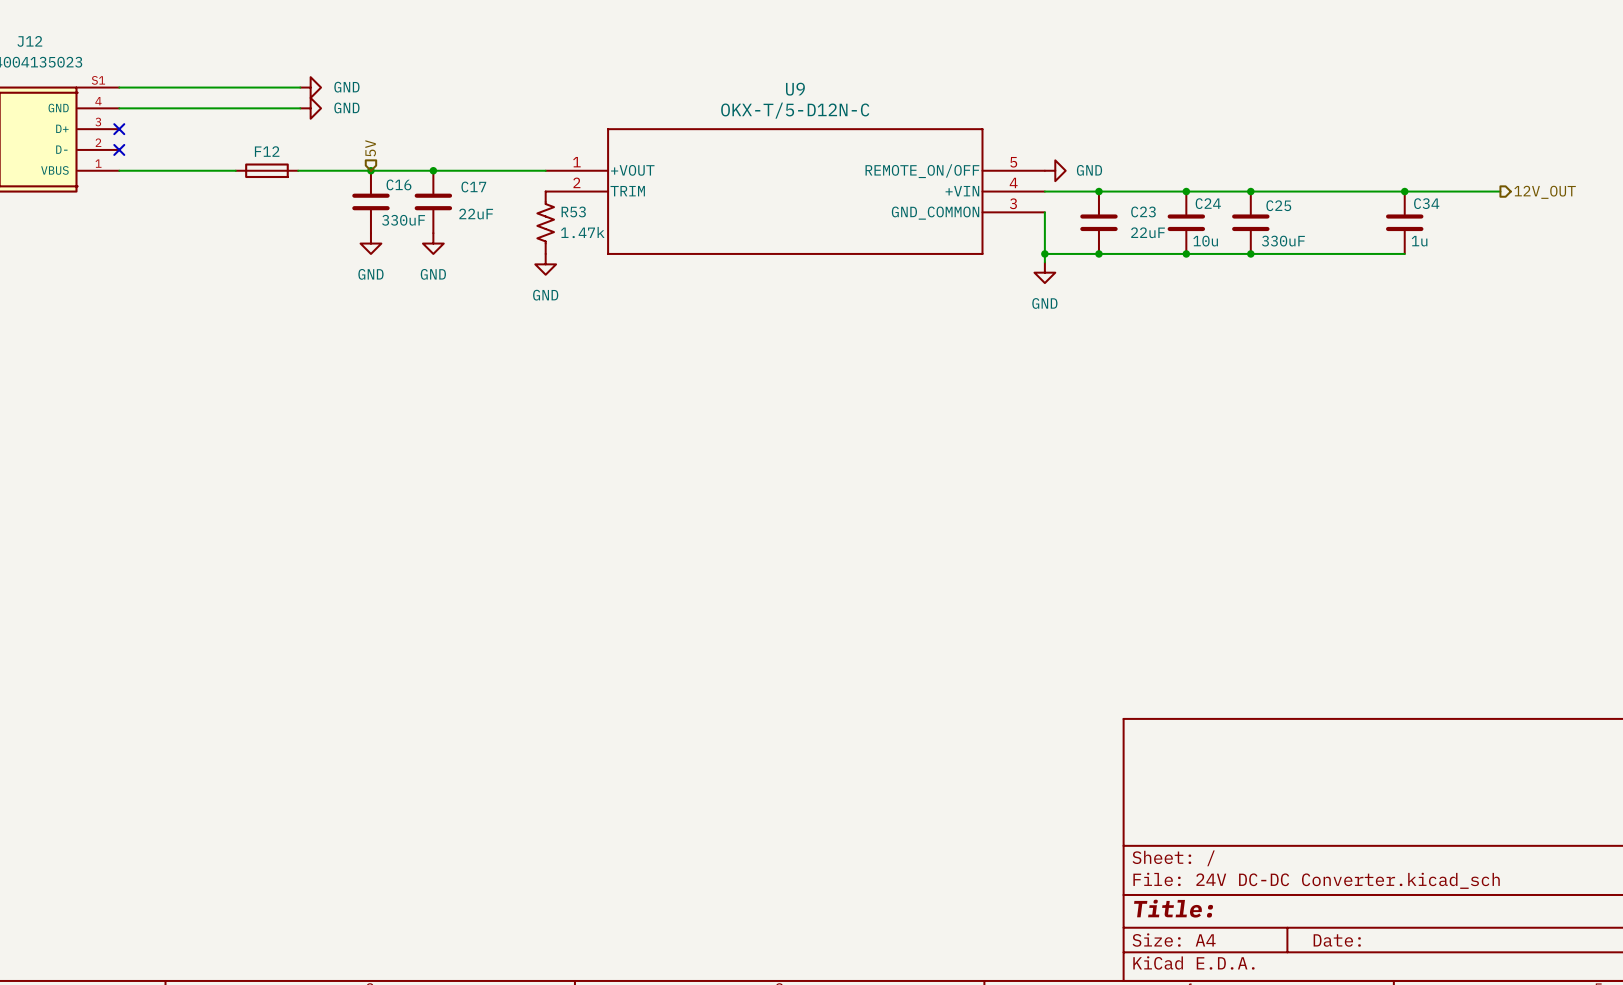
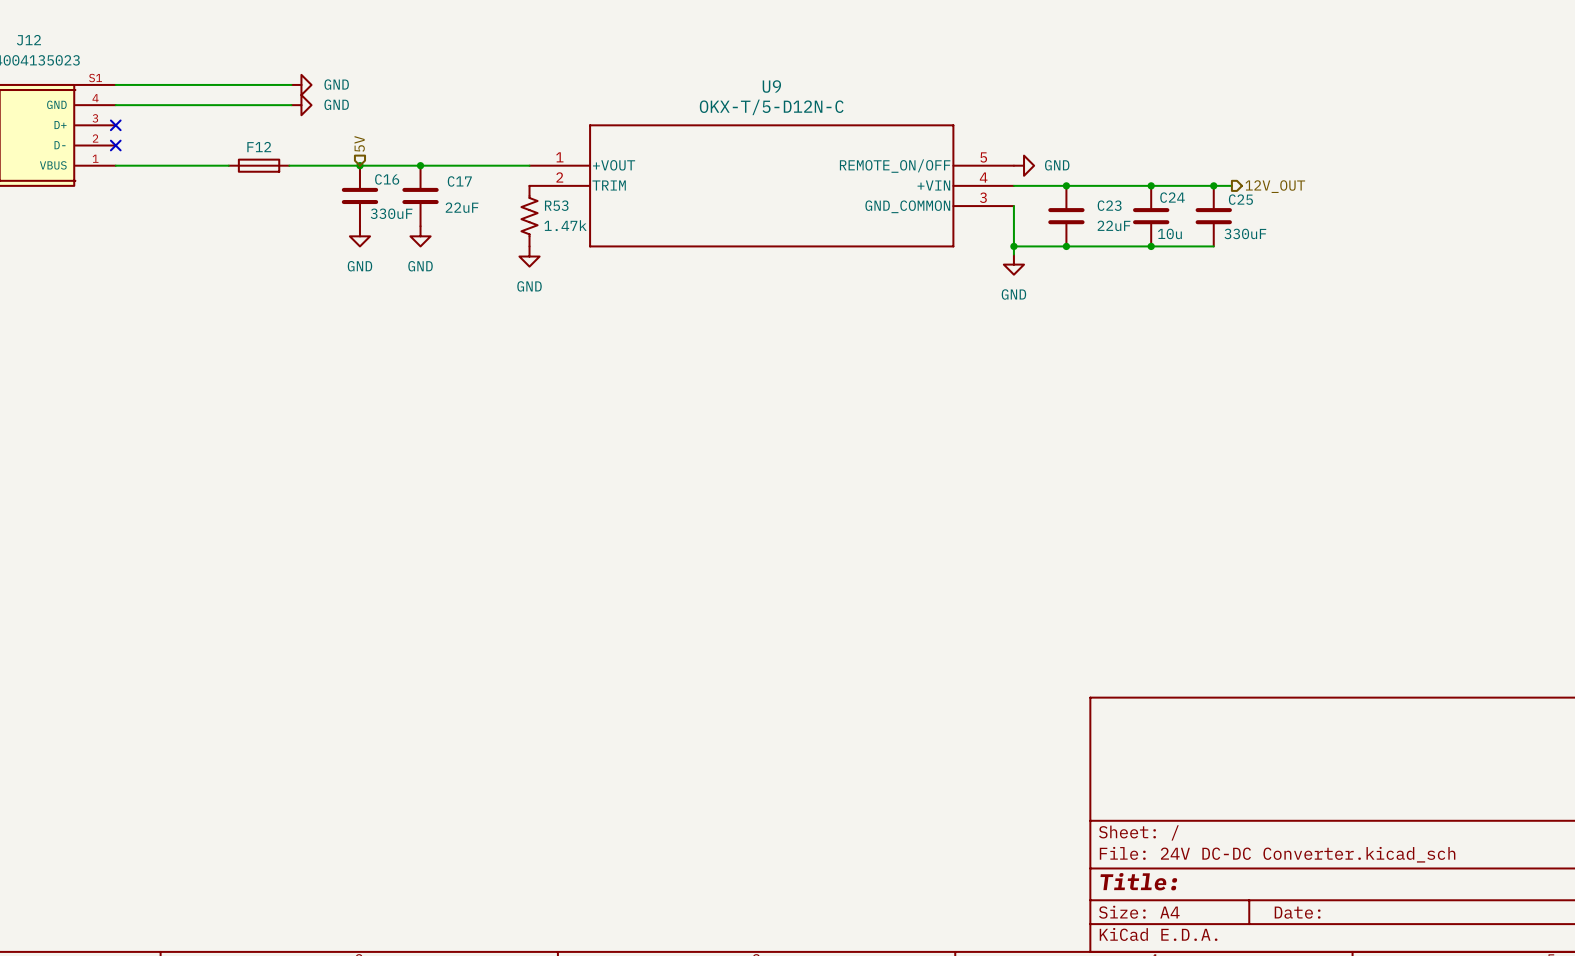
wire: (1269, 191) (1500, 191) -> none
junction: (1404, 191) -> none
hierarchical label: none -> 12V_OUT (1275, 186)
hierarchical label: 12V_OUT (1545, 192) -> none
C34: 1u (1404, 222) -> none
wire: (1250, 253) (1404, 253) -> none
junction: (1250, 253) -> none

